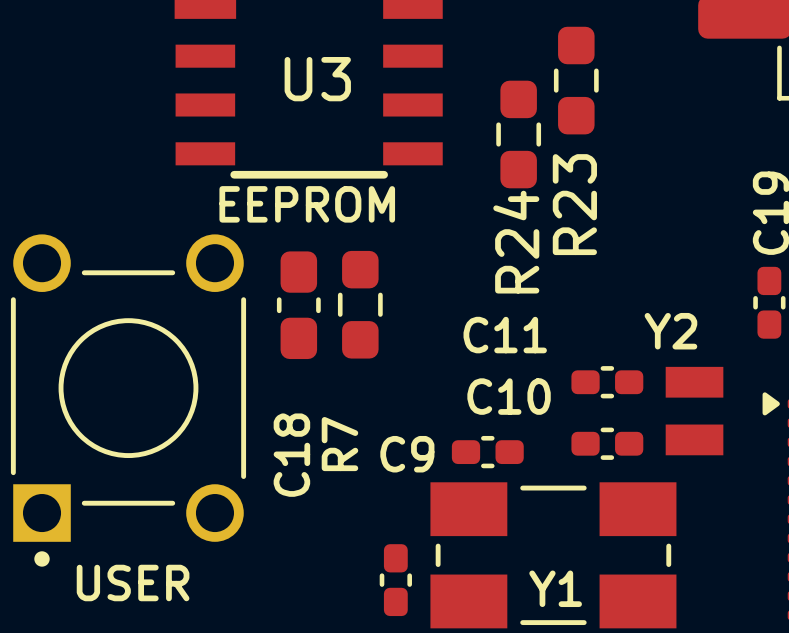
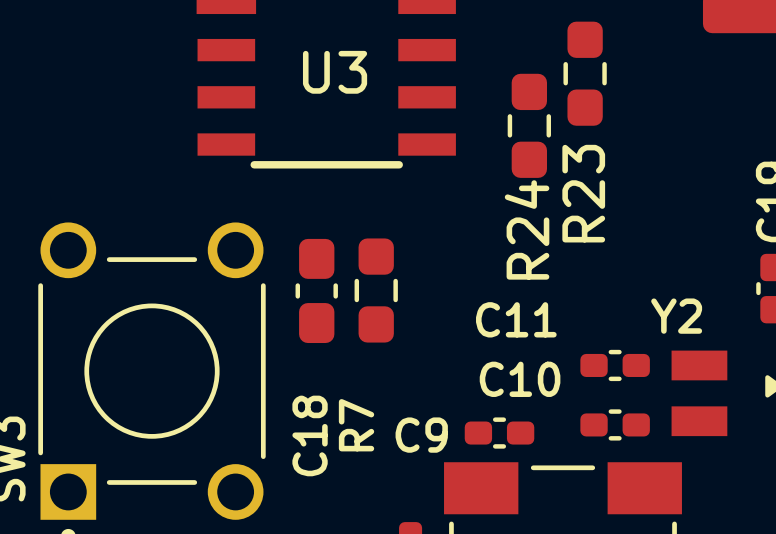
text: EEPROM (307, 204) -> none

